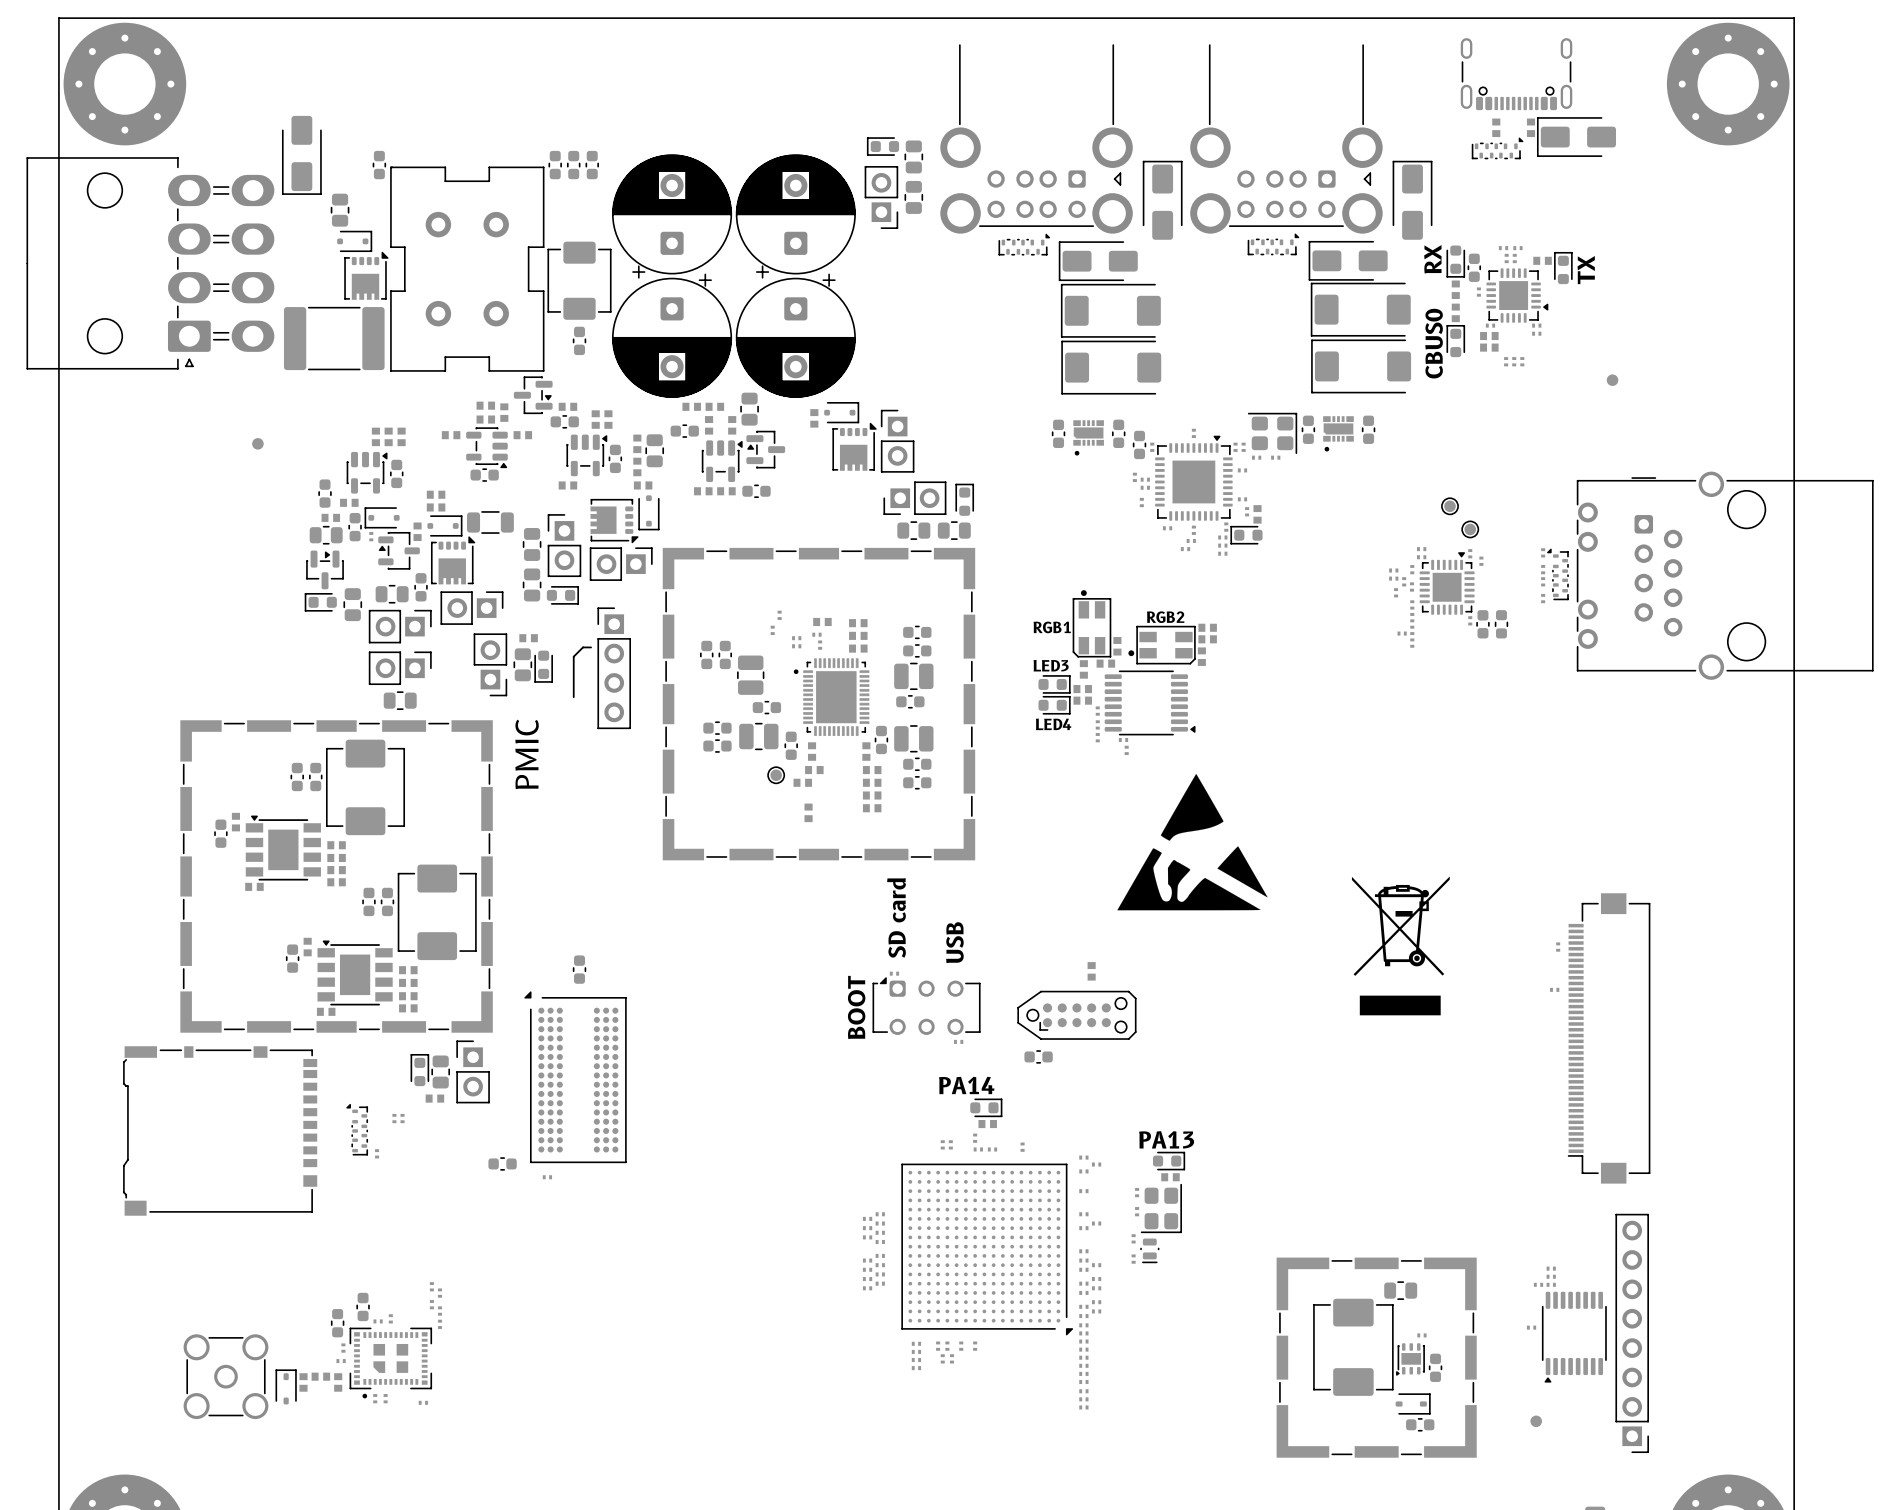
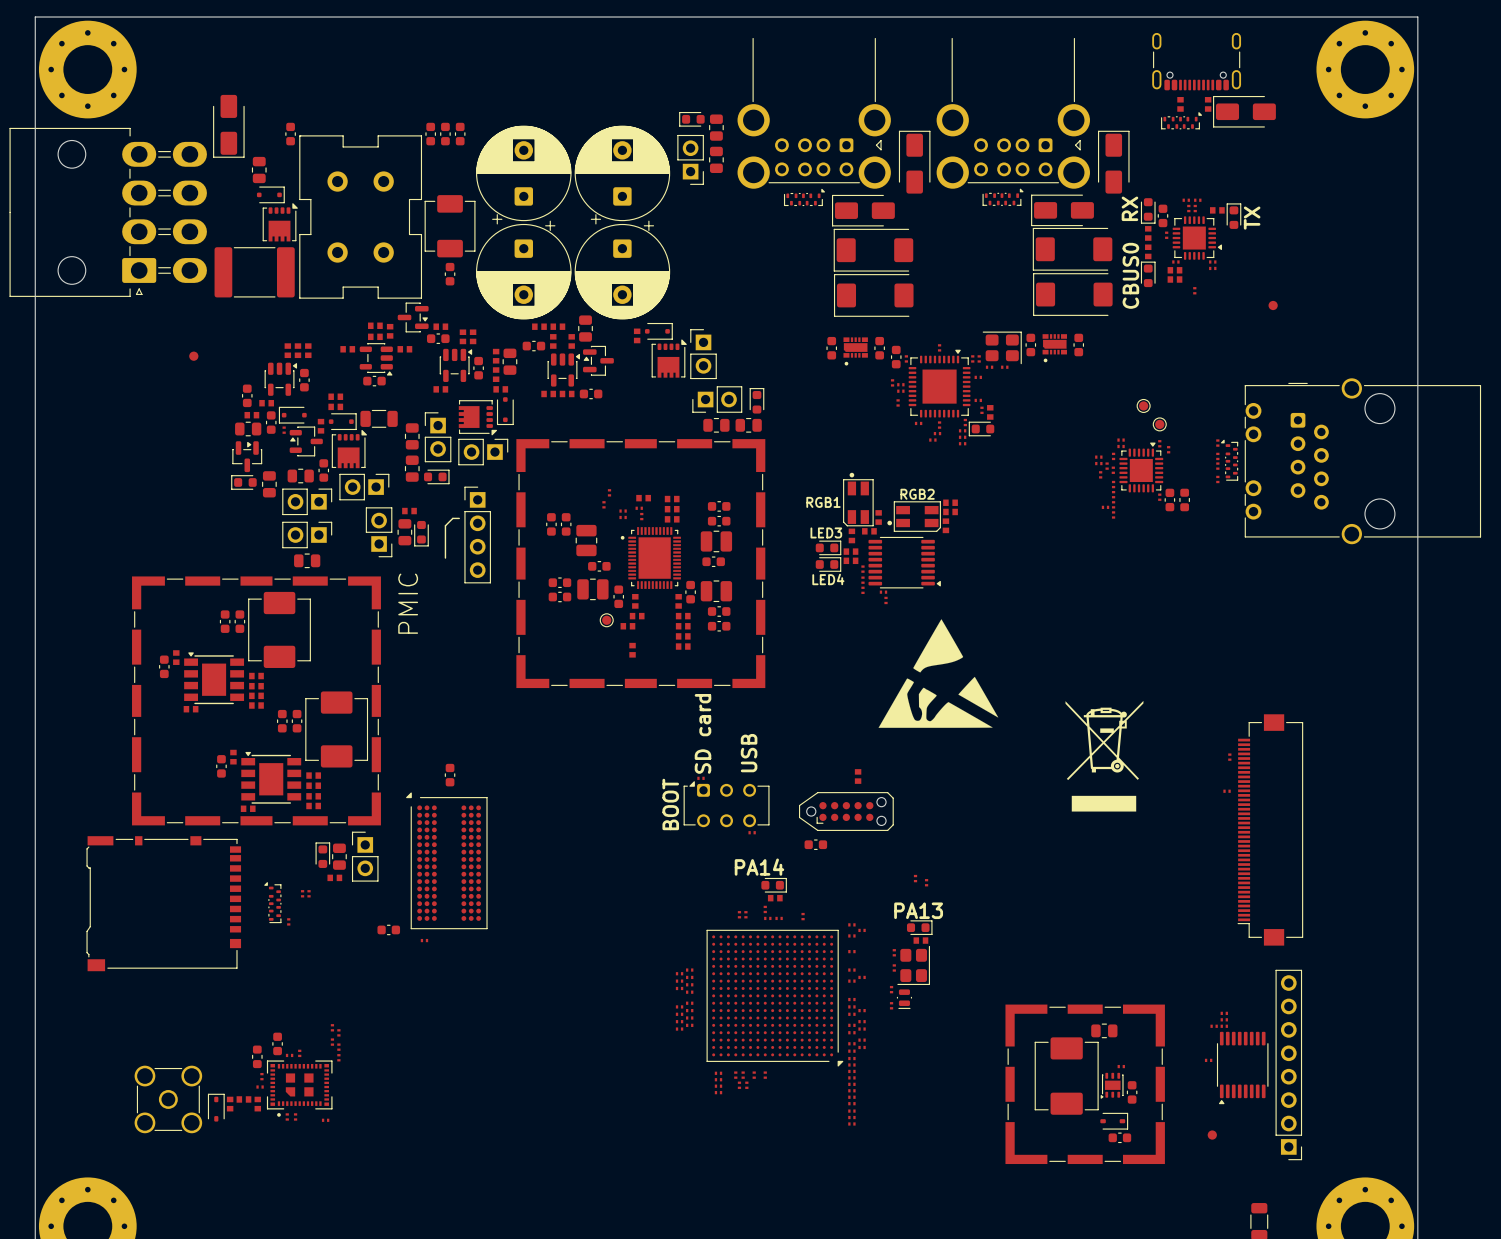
part: (1506, 361) -> none
part: (1522, 361) -> none
part: none -> (915, 878)
part: none -> (926, 882)

